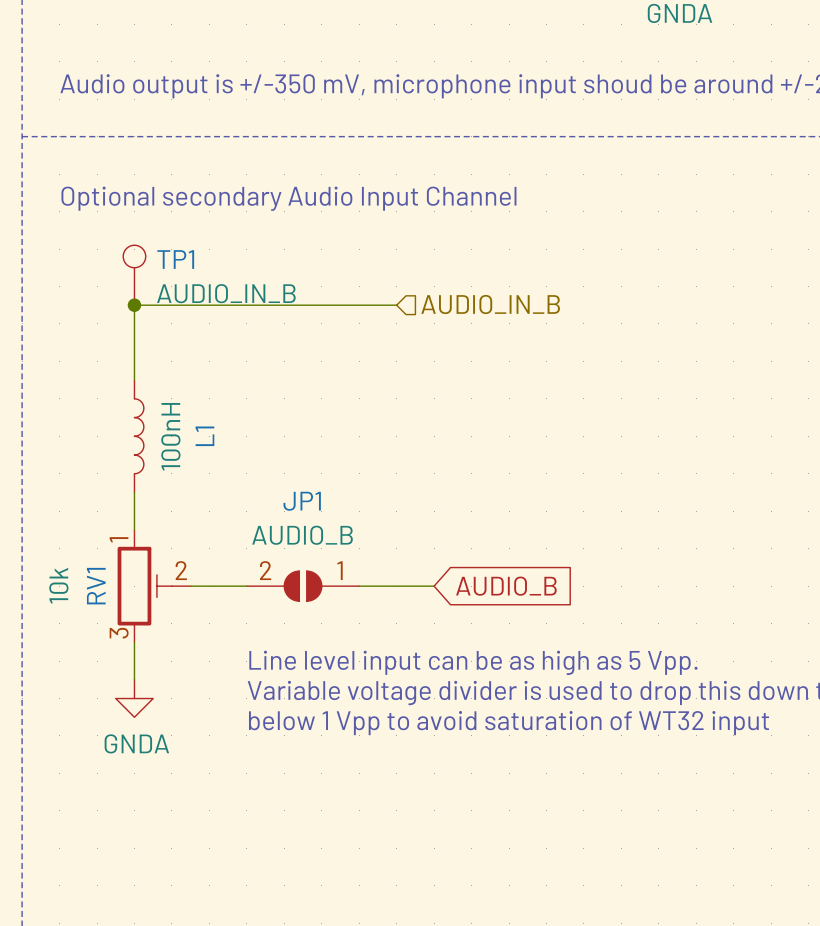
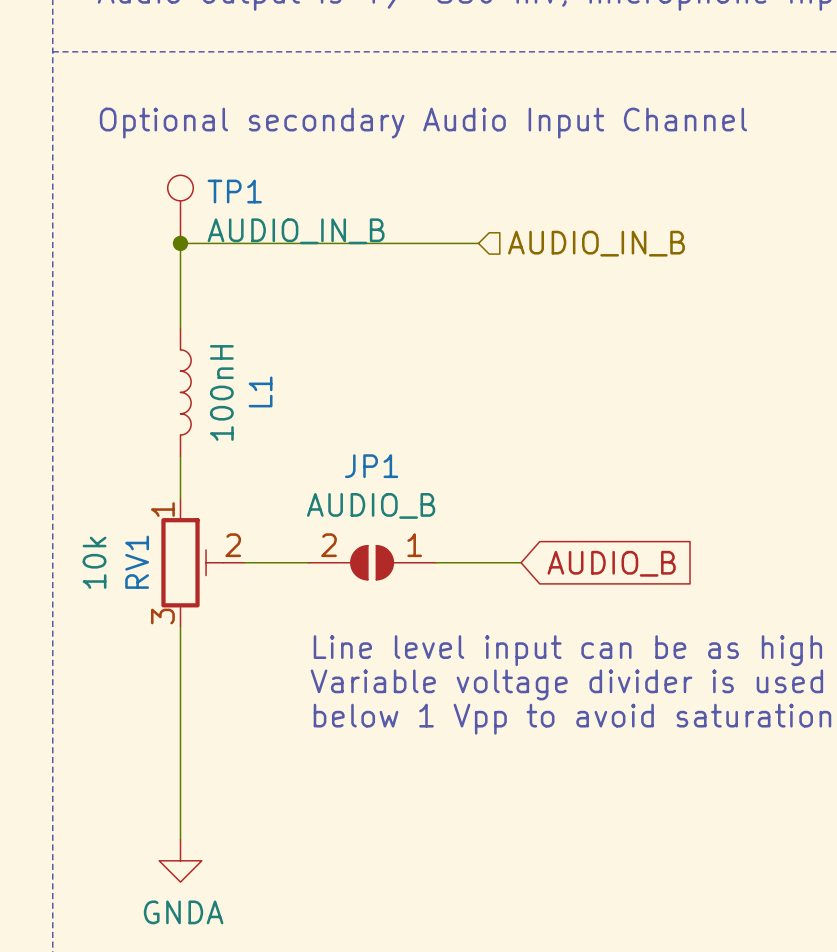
wire: none -> (180, 669) (180, 839)
power symbol position: GNDA (134, 698) -> GNDA (180, 860)

